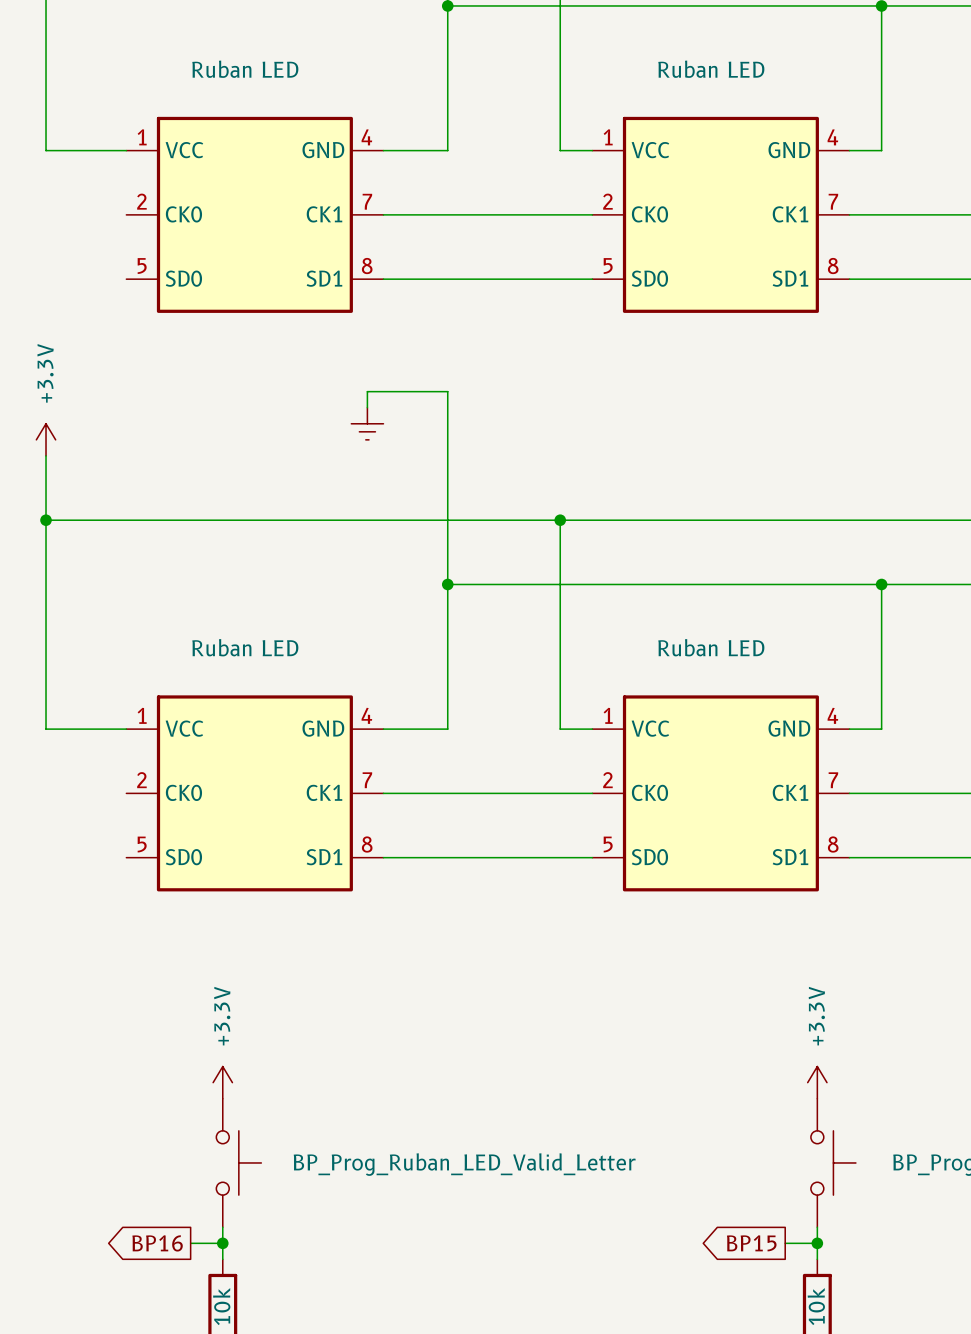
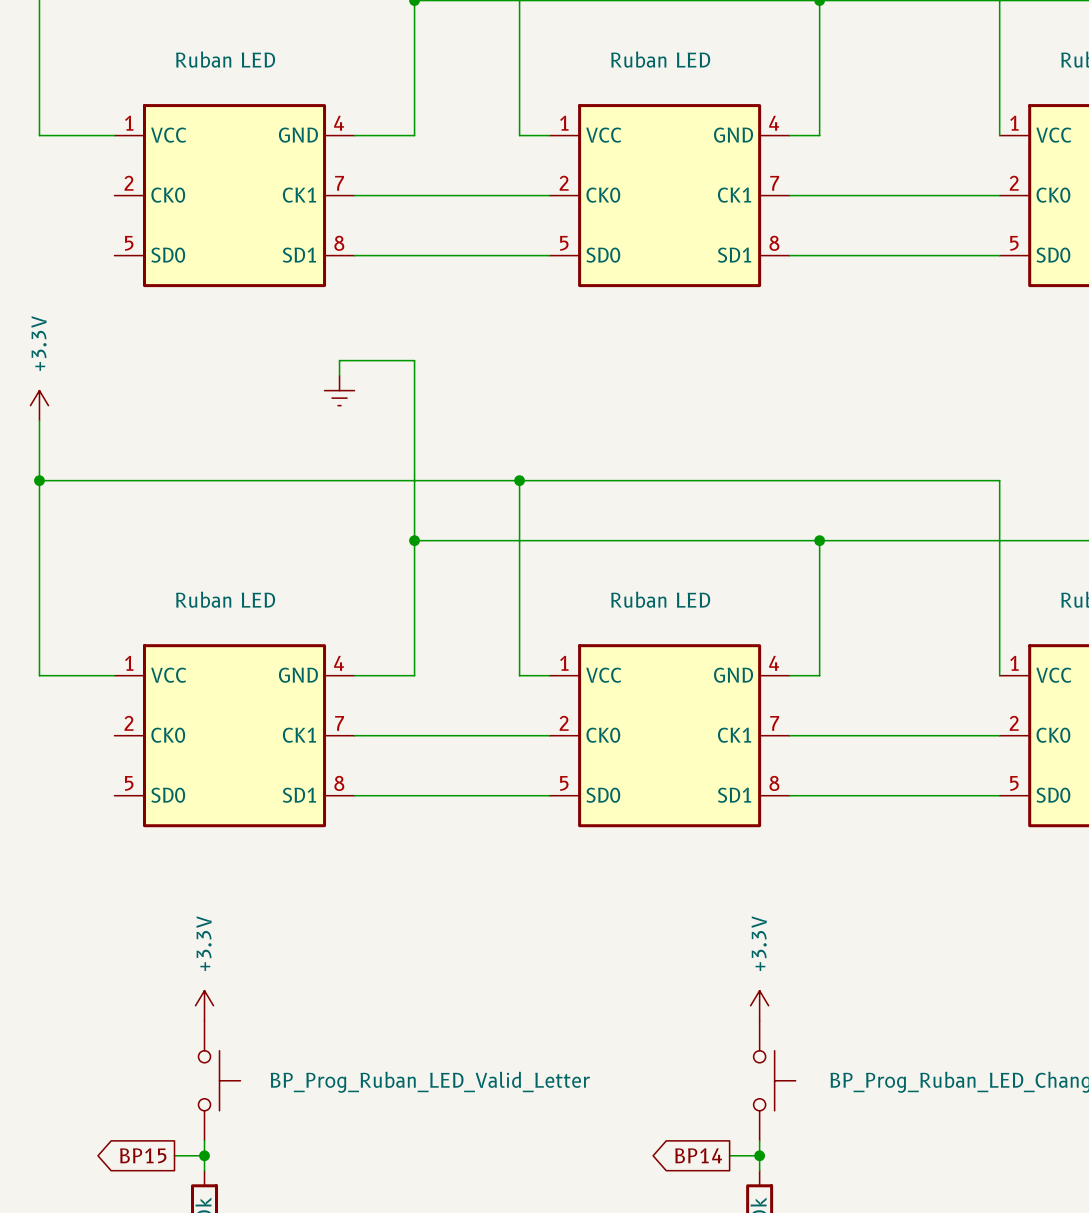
global label: BP16 (157, 1243) -> BP15 (143, 1155)
global label: BP15 (751, 1243) -> BP14 (698, 1155)

